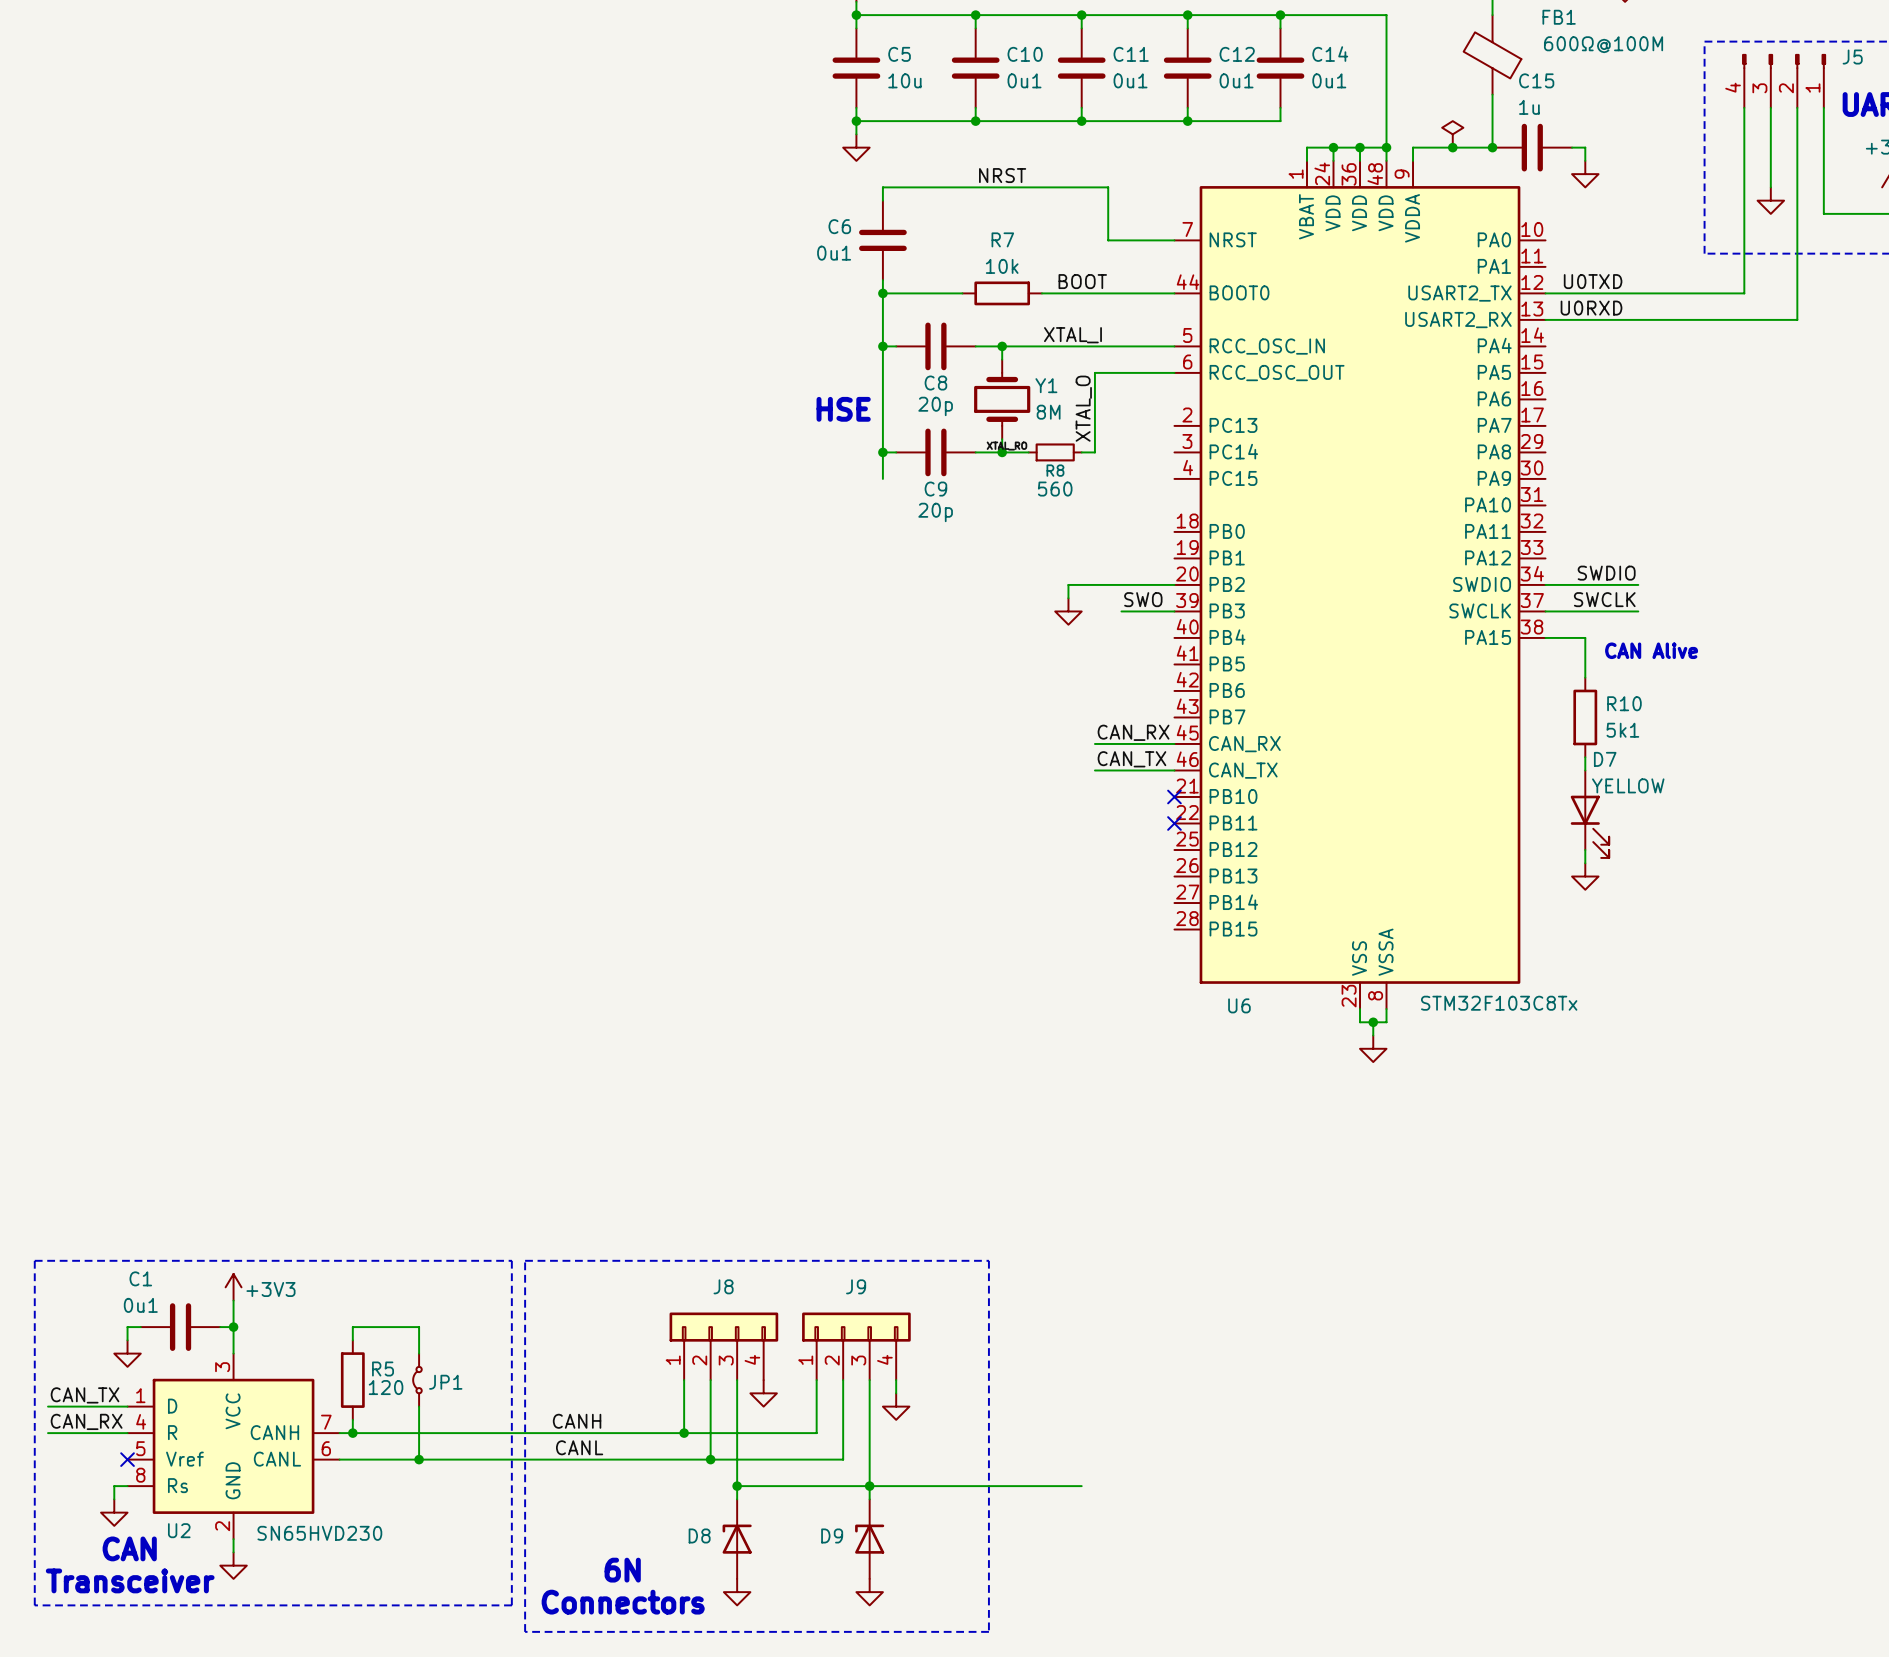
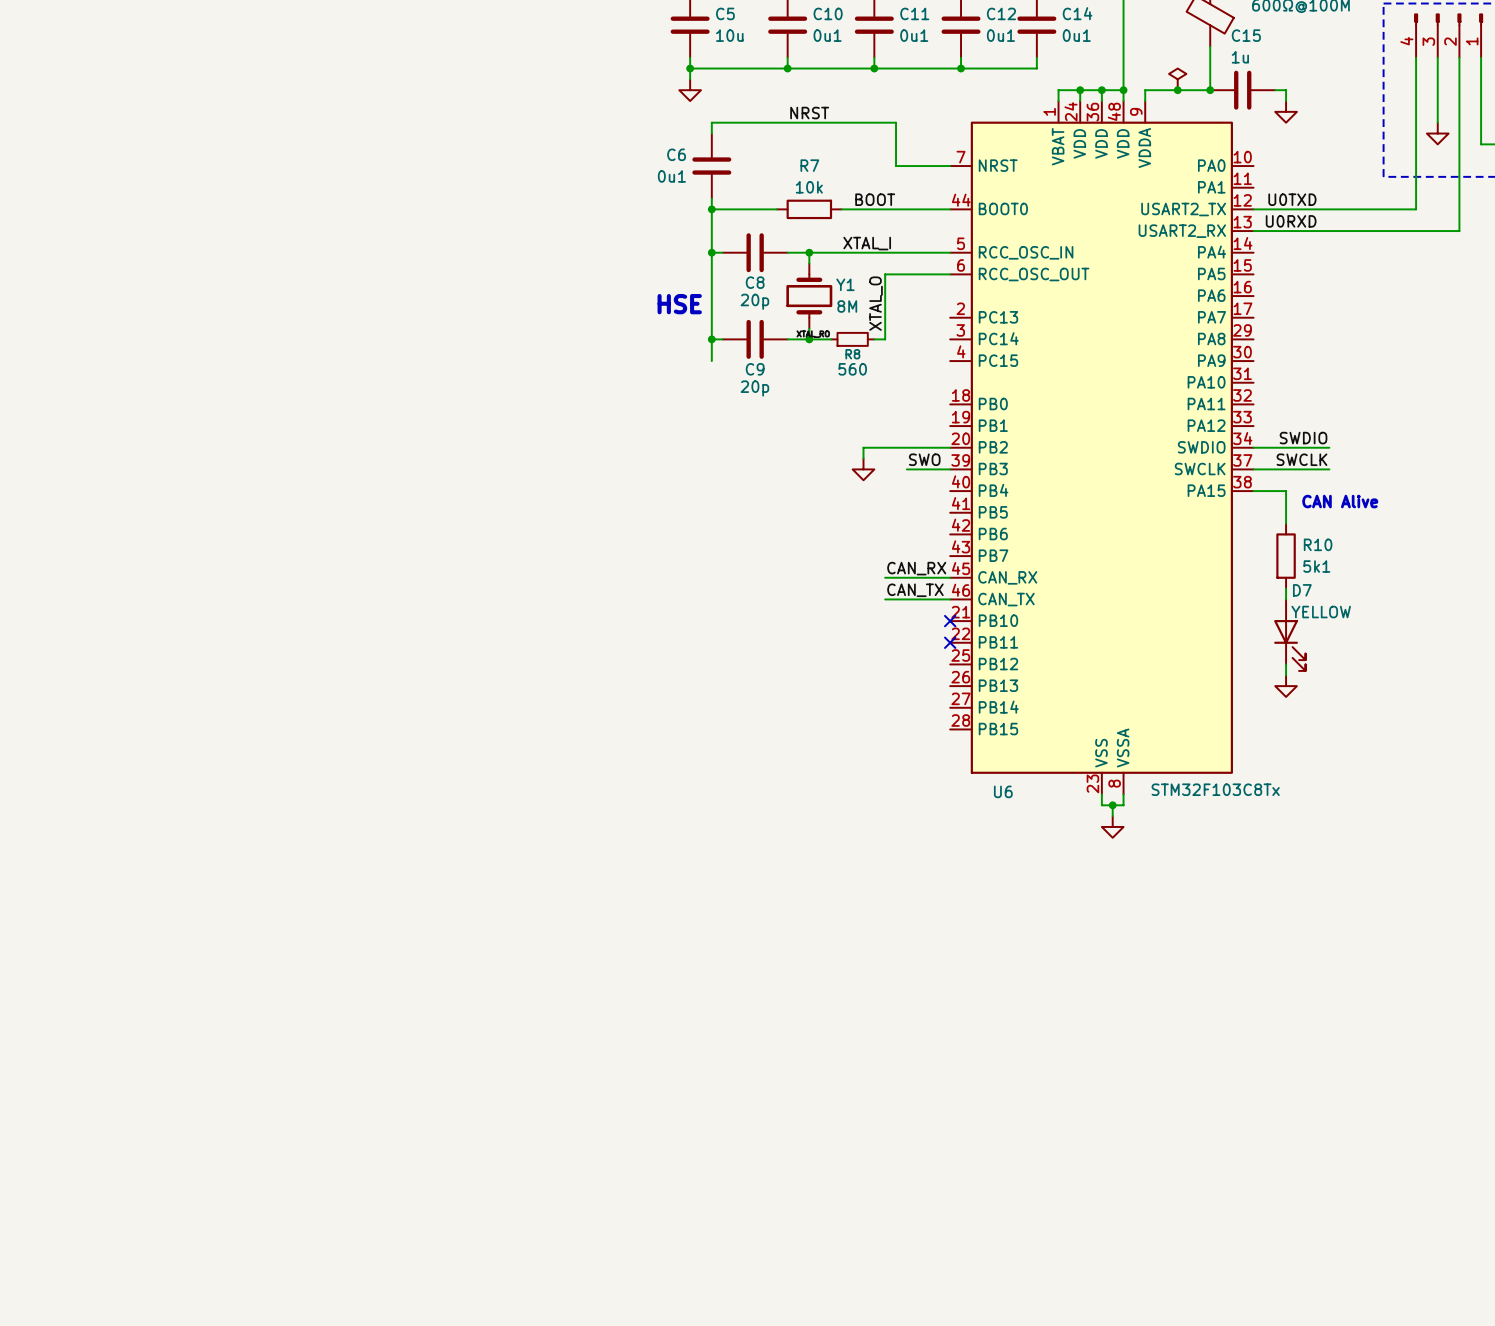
line: (34, 1260) (511, 1260) (511, 1605) (34, 1605) (34, 1260) -> none
line: (525, 1260) (988, 1260) (988, 1631) (525, 1631) (525, 1260) -> none
power symbol: +3V3 (233, 1287) -> none
wire: (233, 1300) (233, 1353) -> none
wire: (140, 1327) (127, 1327) (127, 1340) -> none
C1: 0u1 (180, 1327) -> none
wire: (220, 1327) (233, 1327) -> none
junction: (233, 1327) -> none
wire: (352, 1340) (352, 1327) (419, 1327) (419, 1353) -> none
J8: (723, 1346) -> none
J9: (856, 1346) -> none
power symbol: (127, 1353) -> none
R5: 120 (352, 1380) -> none
JP1: (417, 1380) -> none
wire: (684, 1380) (684, 1433) -> none
wire: (710, 1380) (710, 1459) -> none
wire: (737, 1380) (737, 1499) -> none
wire: (816, 1380) (816, 1433) (339, 1433) -> none
wire: (843, 1380) (843, 1459) (339, 1459) -> none
wire: (869, 1380) (869, 1499) -> none
wire: (896, 1380) (896, 1393) -> none
power symbol: (763, 1393) -> none
label: CAN_TX (85, 1395) -> none
wire: (48, 1406) (127, 1406) -> none
wire: (419, 1406) (419, 1459) -> none
power symbol: (896, 1406) -> none
wire: (352, 1419) (352, 1433) -> none
label: CAN_RX (86, 1421) -> none
label: CANH (577, 1421) -> none
wire: (48, 1433) (127, 1433) -> none
junction: (352, 1433) -> none
junction: (684, 1433) -> none
U2: SN65HVD230 (233, 1446) -> none
label: CANL (579, 1447) -> none
no-connect mark: (127, 1459) -> none
junction: (419, 1459) -> none
junction: (710, 1459) -> none
wire: (127, 1486) (114, 1486) (114, 1499) -> none
wire: (737, 1486) (1081, 1486) -> none
junction: (737, 1486) -> none
junction: (869, 1486) -> none
power symbol: (114, 1512) -> none
wire: (233, 1539) (233, 1552) -> none
D8: (737, 1539) -> none
D9: (869, 1539) -> none
text: CAN (129, 1548) -> none
power symbol: (233, 1565) -> none
text: 6N (622, 1570) -> none
text: Transceiver (130, 1580) -> none
power symbol: (737, 1592) -> none
power symbol: (869, 1592) -> none
text: Connectors (623, 1602) -> none

